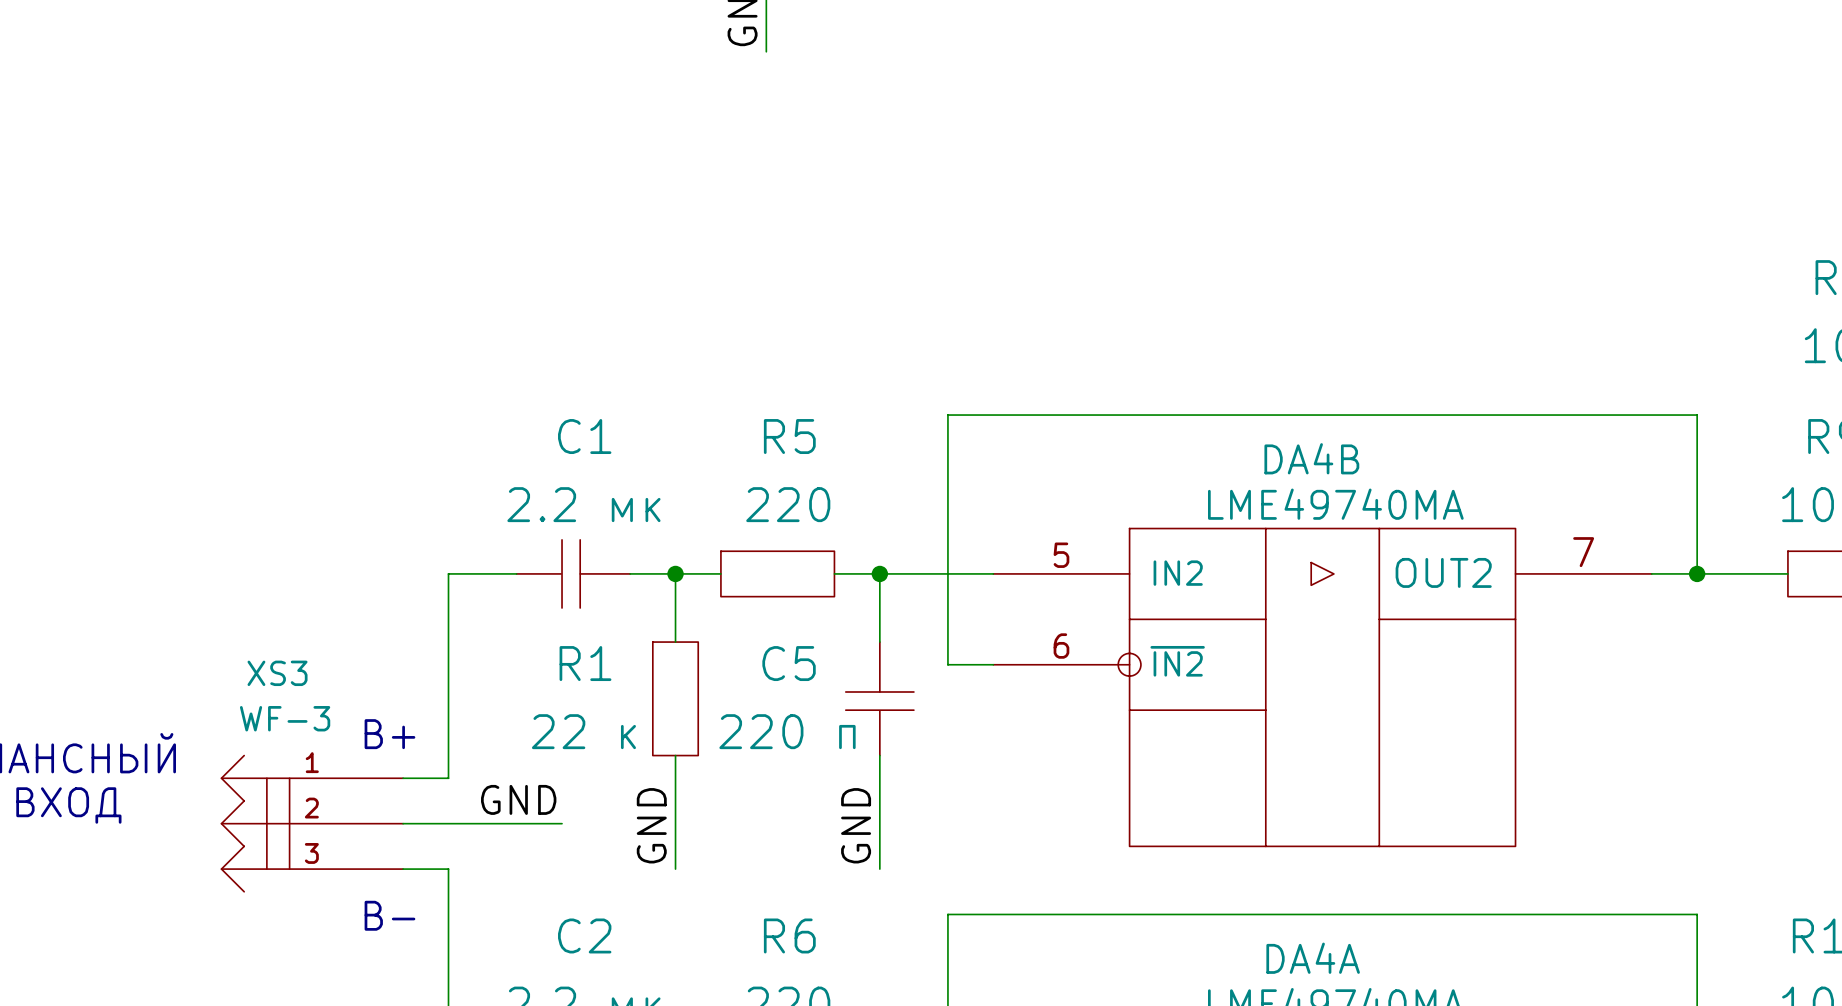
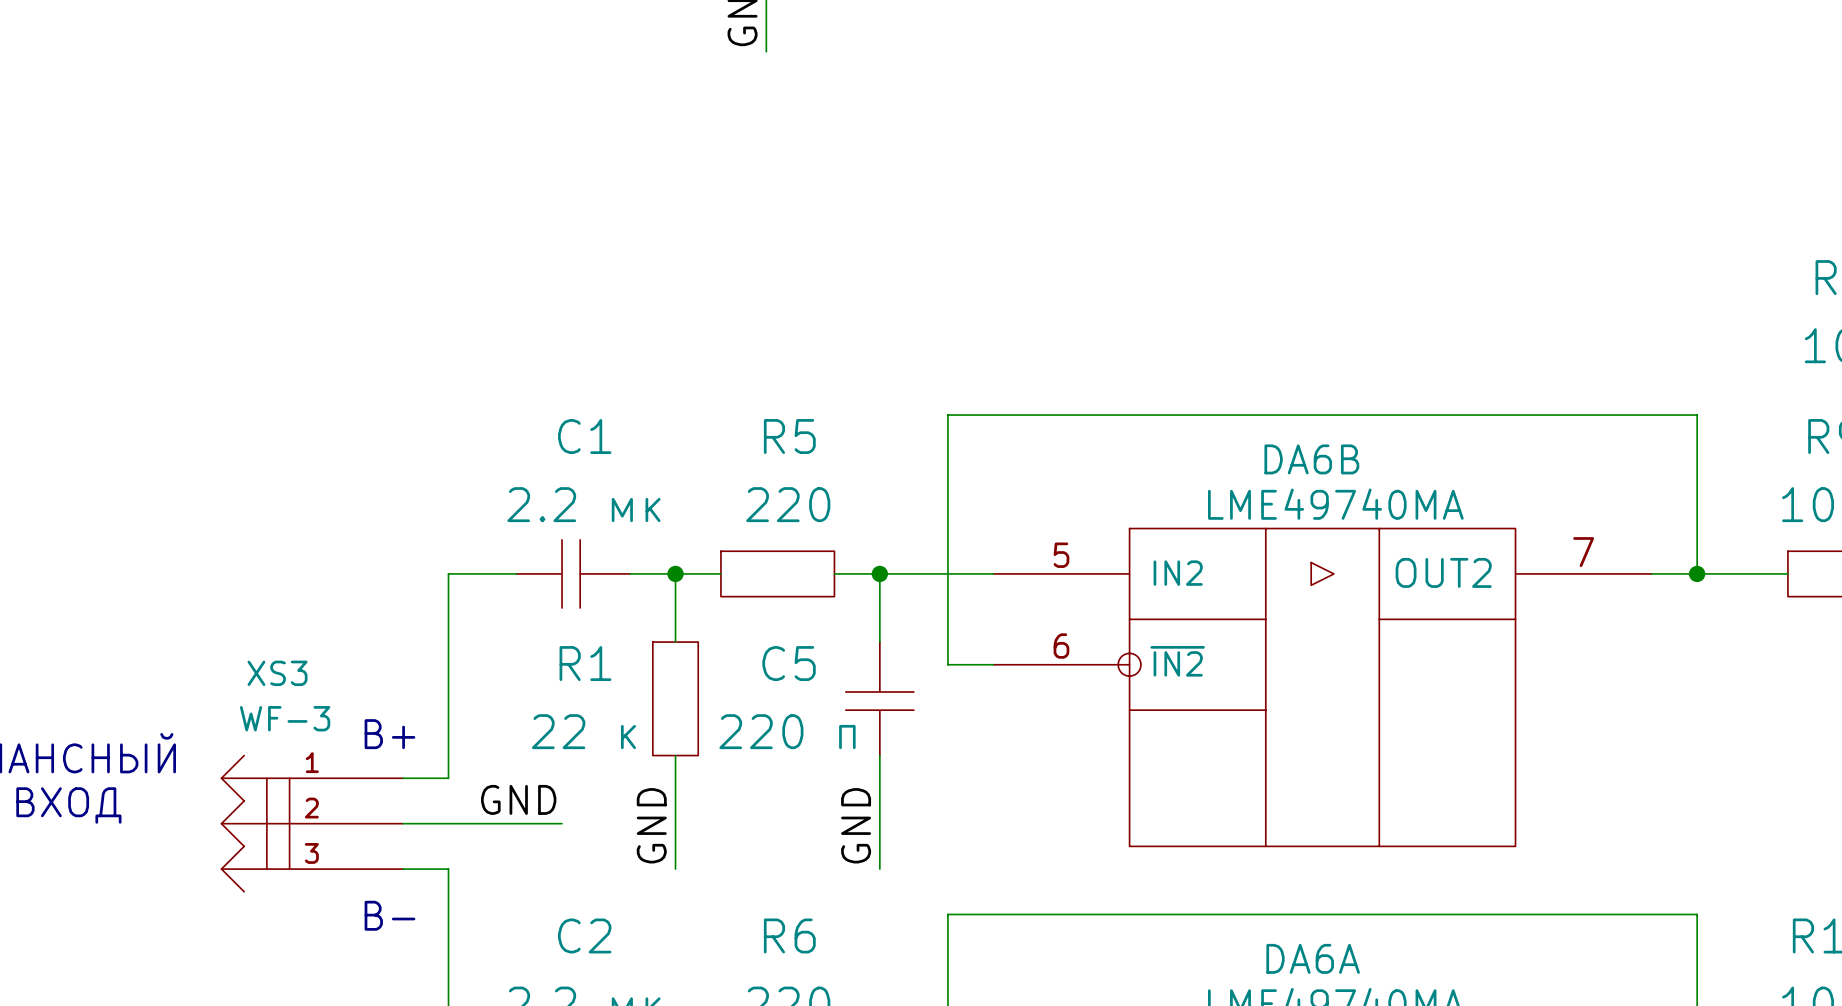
DA4B name: DA4B (1311, 458) -> DA6B (1311, 459)
DA4A name: DA4A (1313, 958) -> DA6A (1313, 958)

